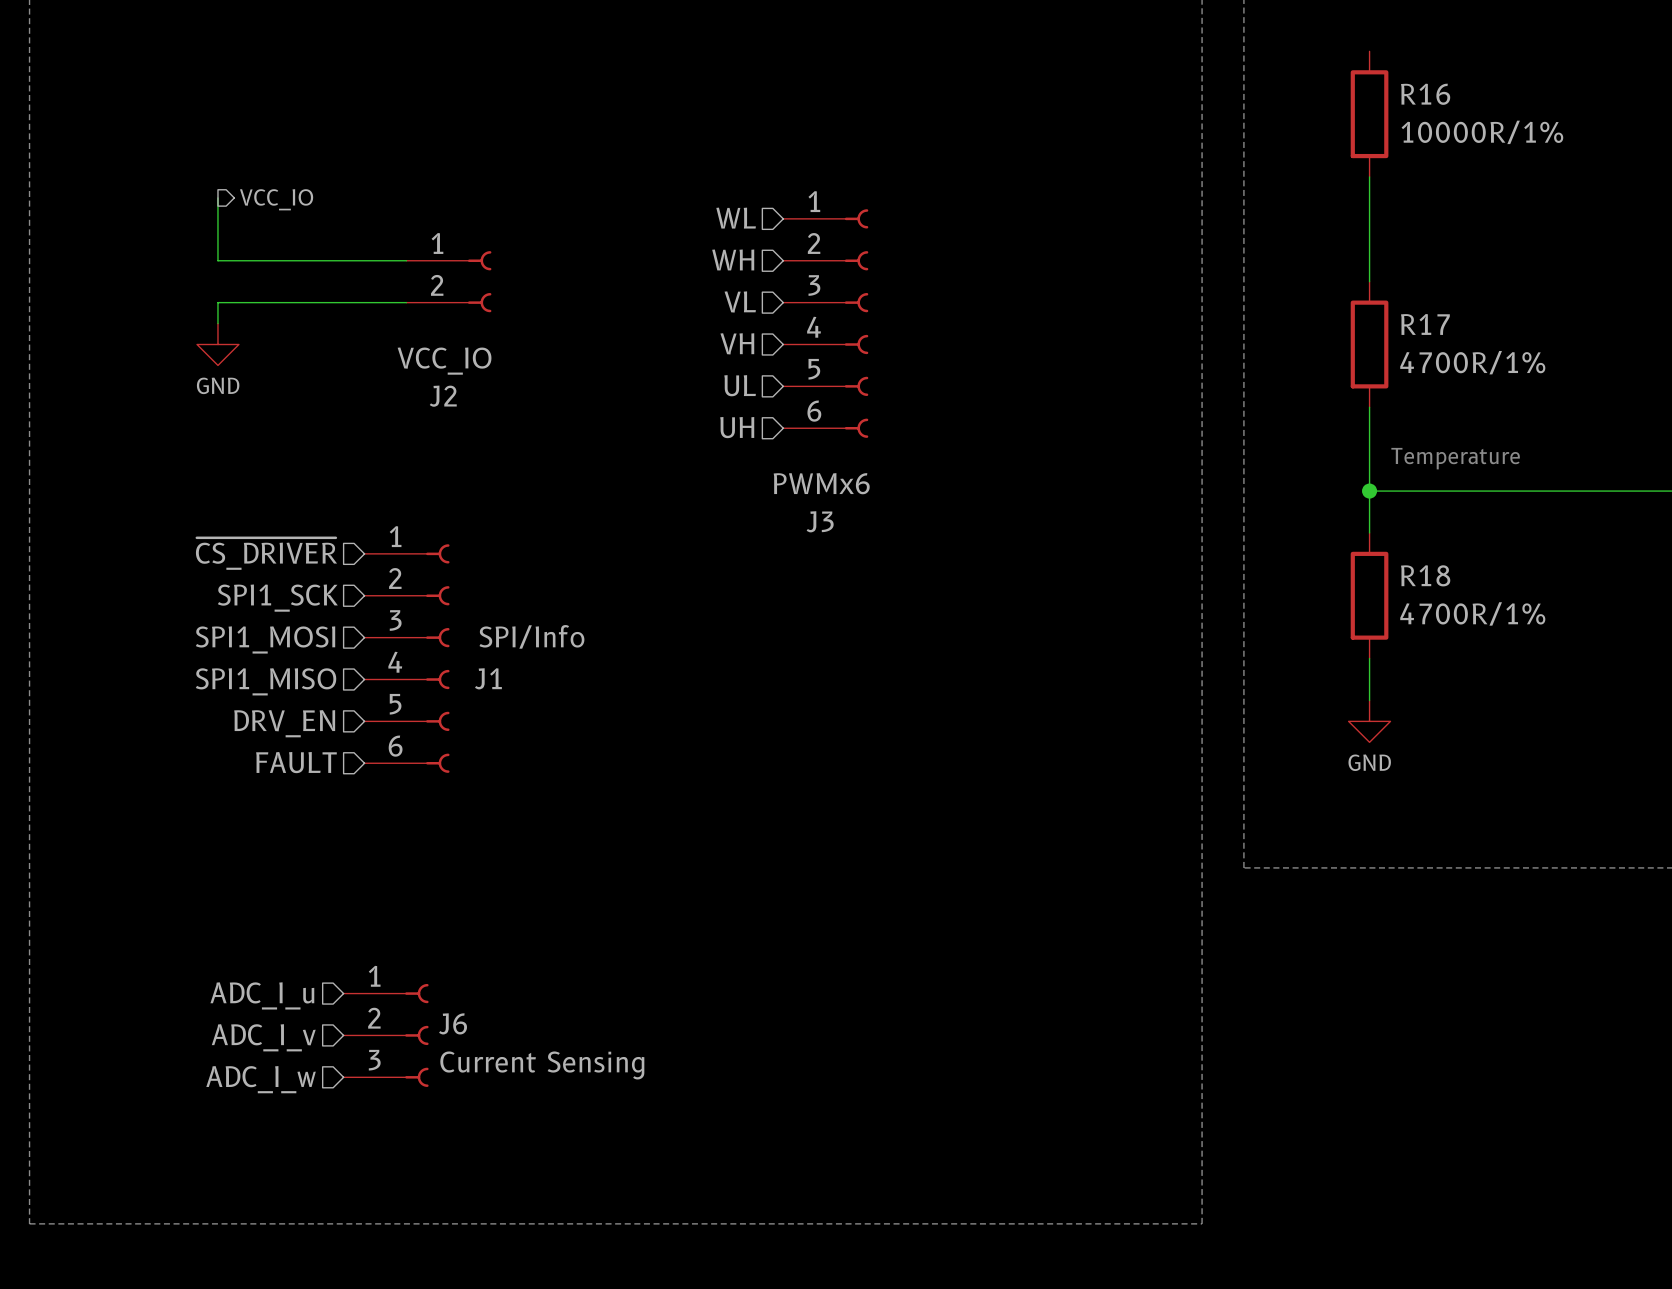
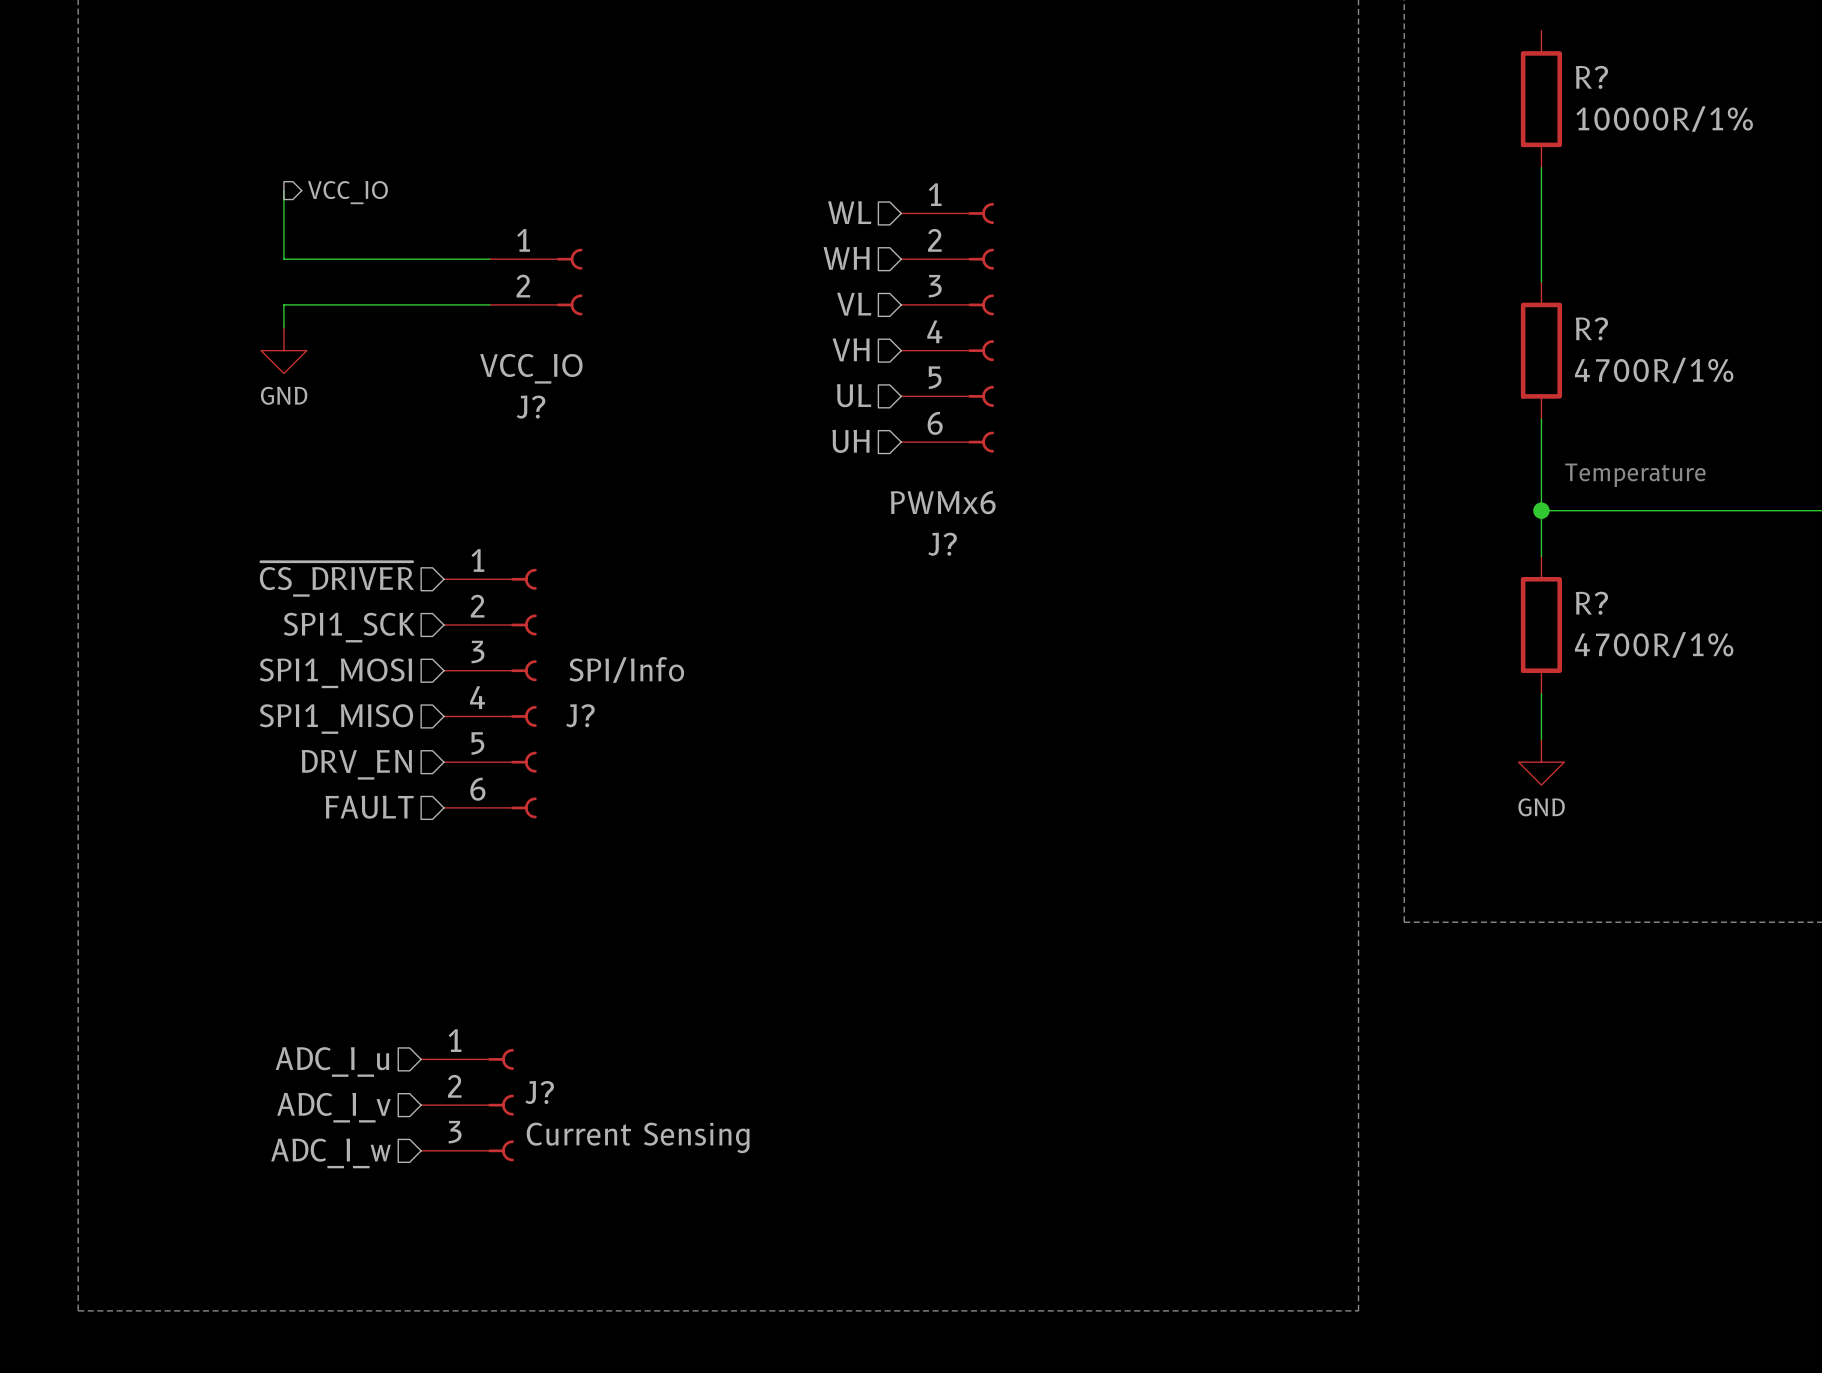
R16 name: R16 (1425, 94) -> R? (1591, 77)
R17 name: R17 (1425, 324) -> R? (1591, 328)
J2 name: J2 (443, 396) -> J? (531, 407)
J3 name: J3 (820, 521) -> J? (942, 544)
R18 name: R18 (1425, 575) -> R? (1591, 603)
J1 name: J1 (488, 678) -> J? (580, 715)
J6 name: J6 (453, 1023) -> J? (539, 1092)

